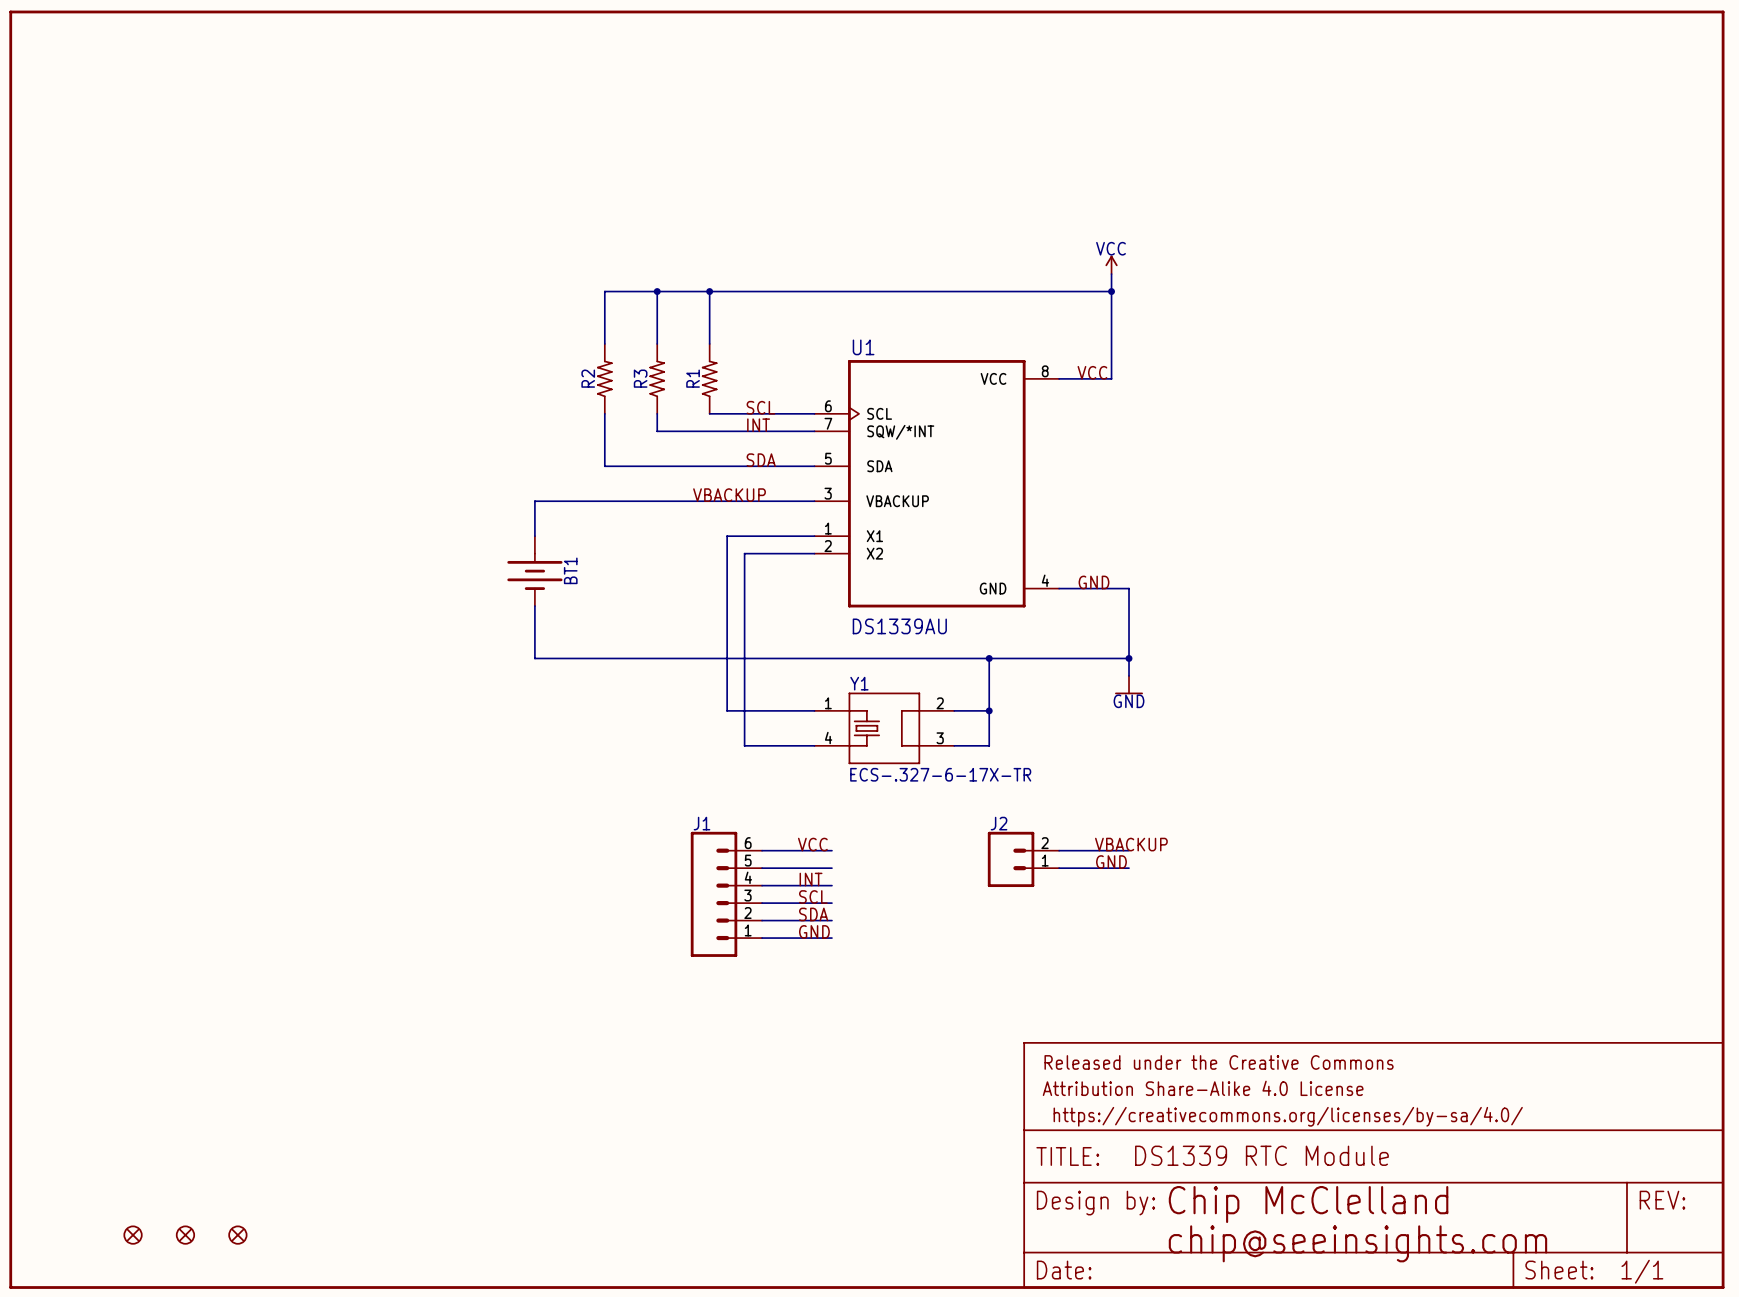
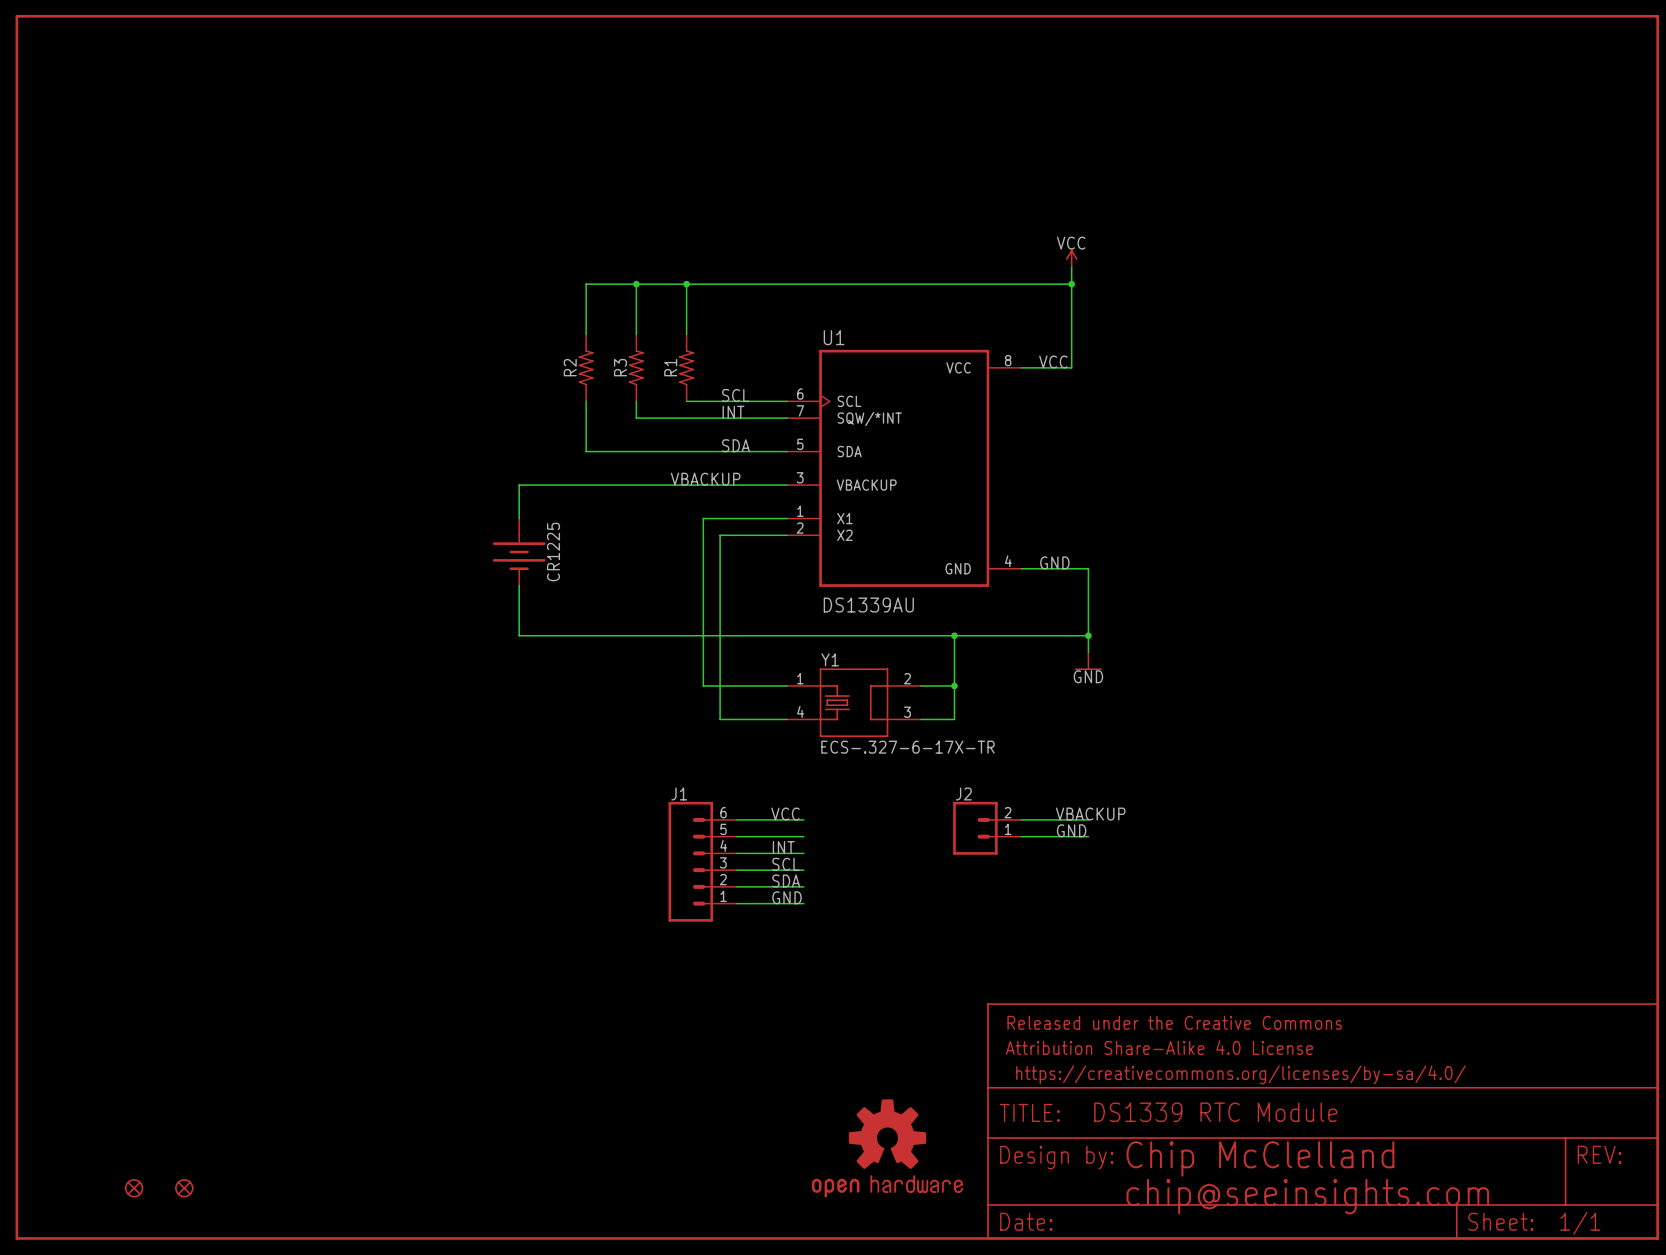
BT1 name: BT1 (570, 570) -> CR1225 (553, 552)
part: none -> (887, 1148)
part: (237, 1235) -> none

